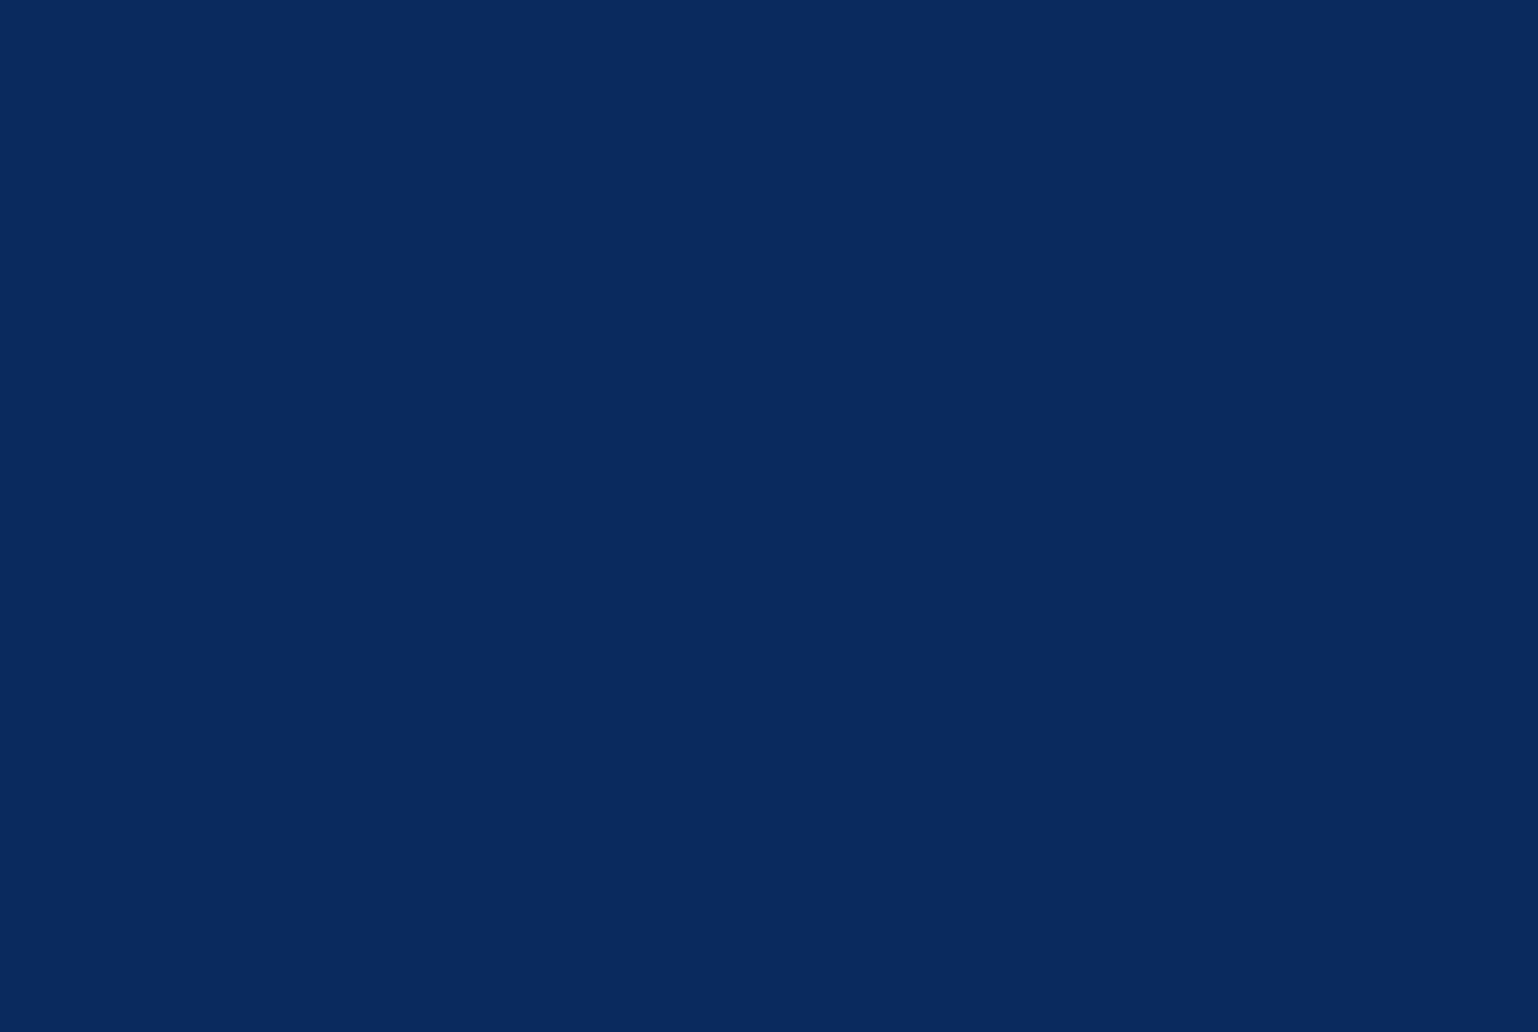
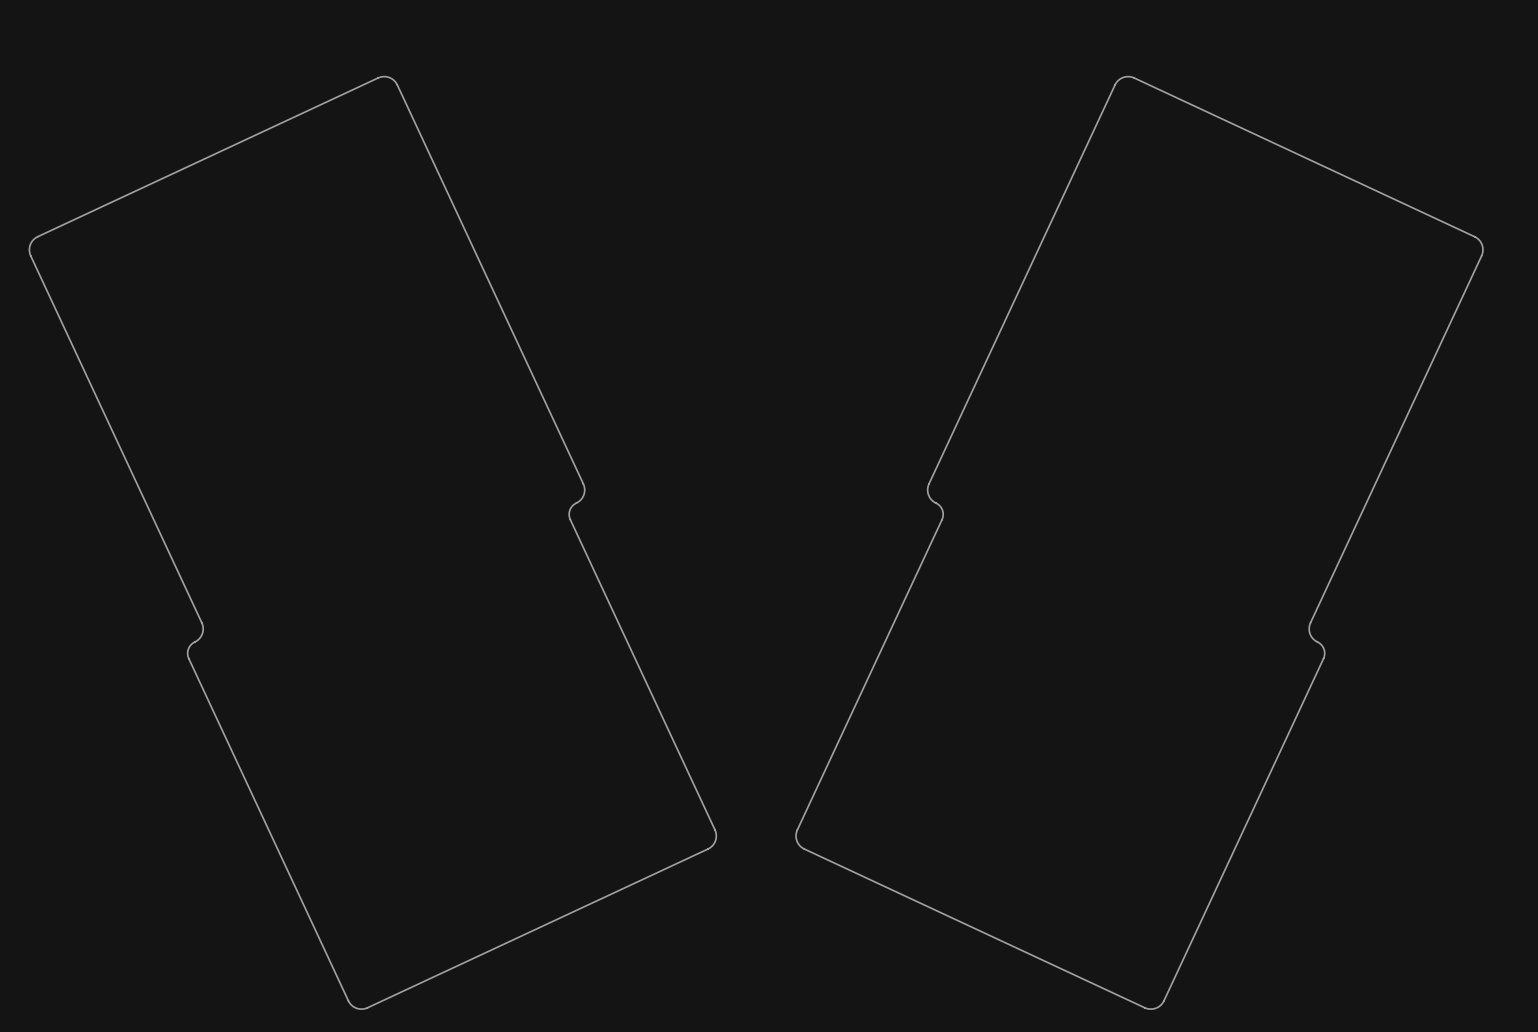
board edge: none -> (378, 77) (37, 236) (32, 241) (29, 250) (201, 622) (202, 633) (188, 647) (188, 658) (348, 1000) (353, 1006) (362, 1009) (707, 849) (713, 844) (716, 835) (569, 518) (571, 507) (583, 494) (583, 483) (397, 84) (389, 77) (378, 77)
board edge: none -> (1134, 77) (1474, 236) (1480, 241) (1482, 250) (1310, 622) (1310, 633) (1323, 647) (1323, 658) (1163, 1000) (1159, 1006) (1150, 1009) (804, 849) (798, 844) (796, 835) (942, 518) (941, 507) (928, 494) (929, 483) (1115, 84) (1123, 77) (1134, 77)

